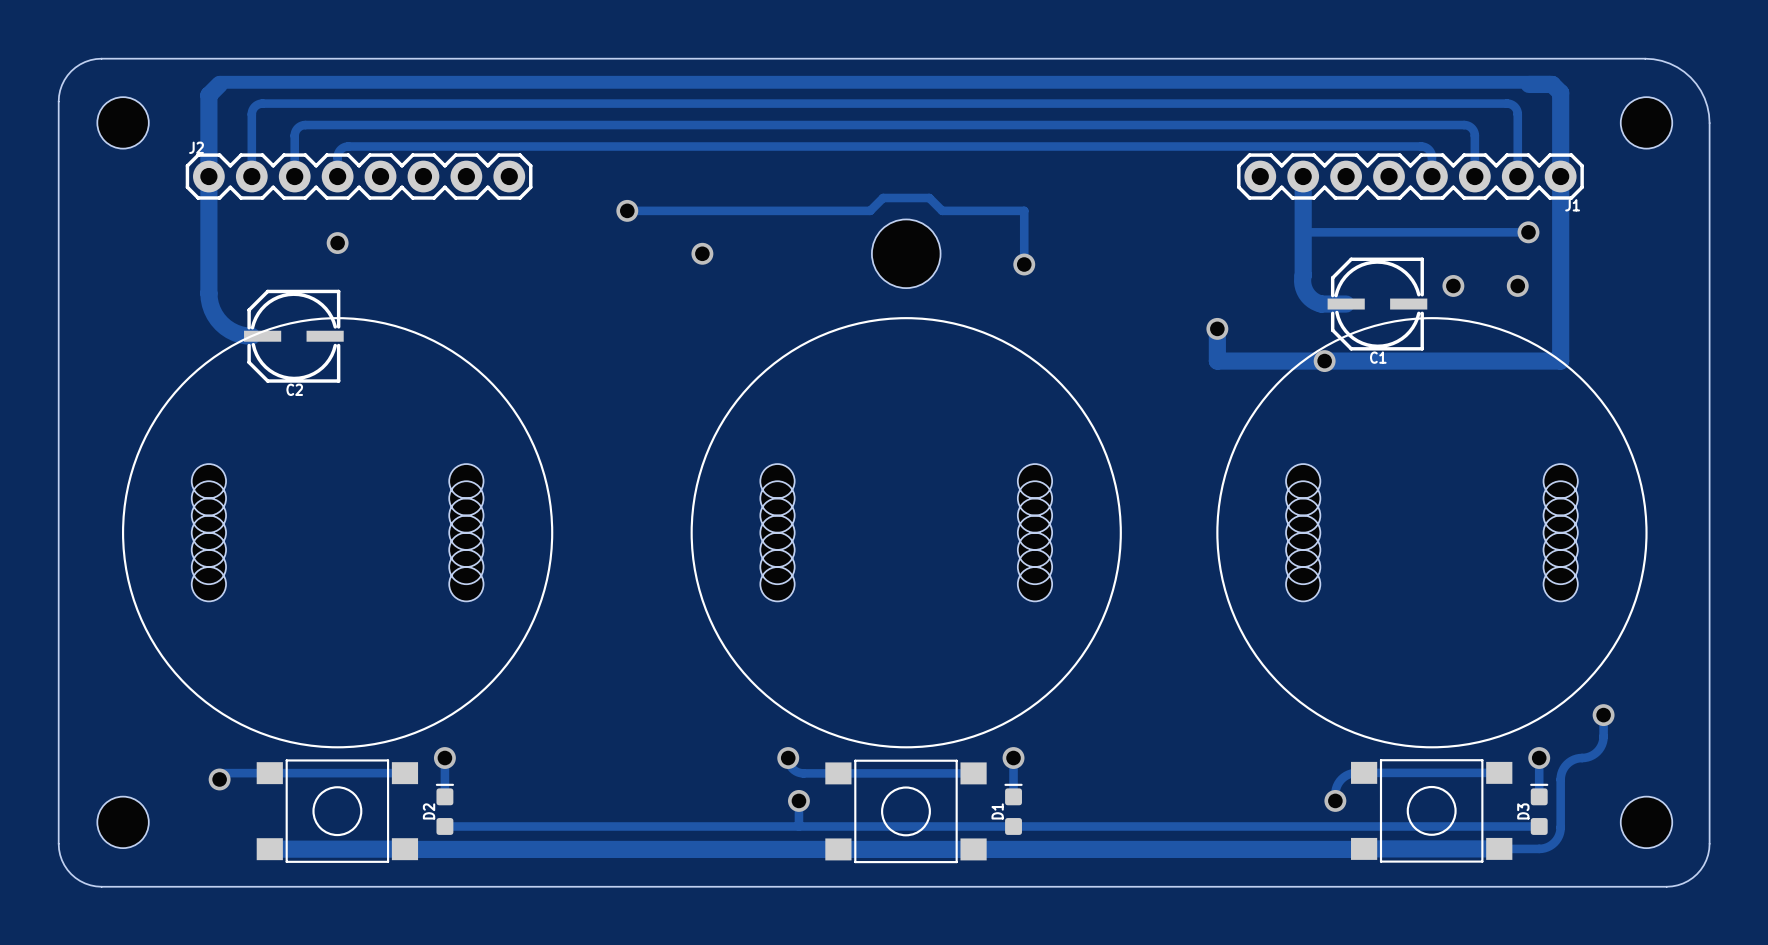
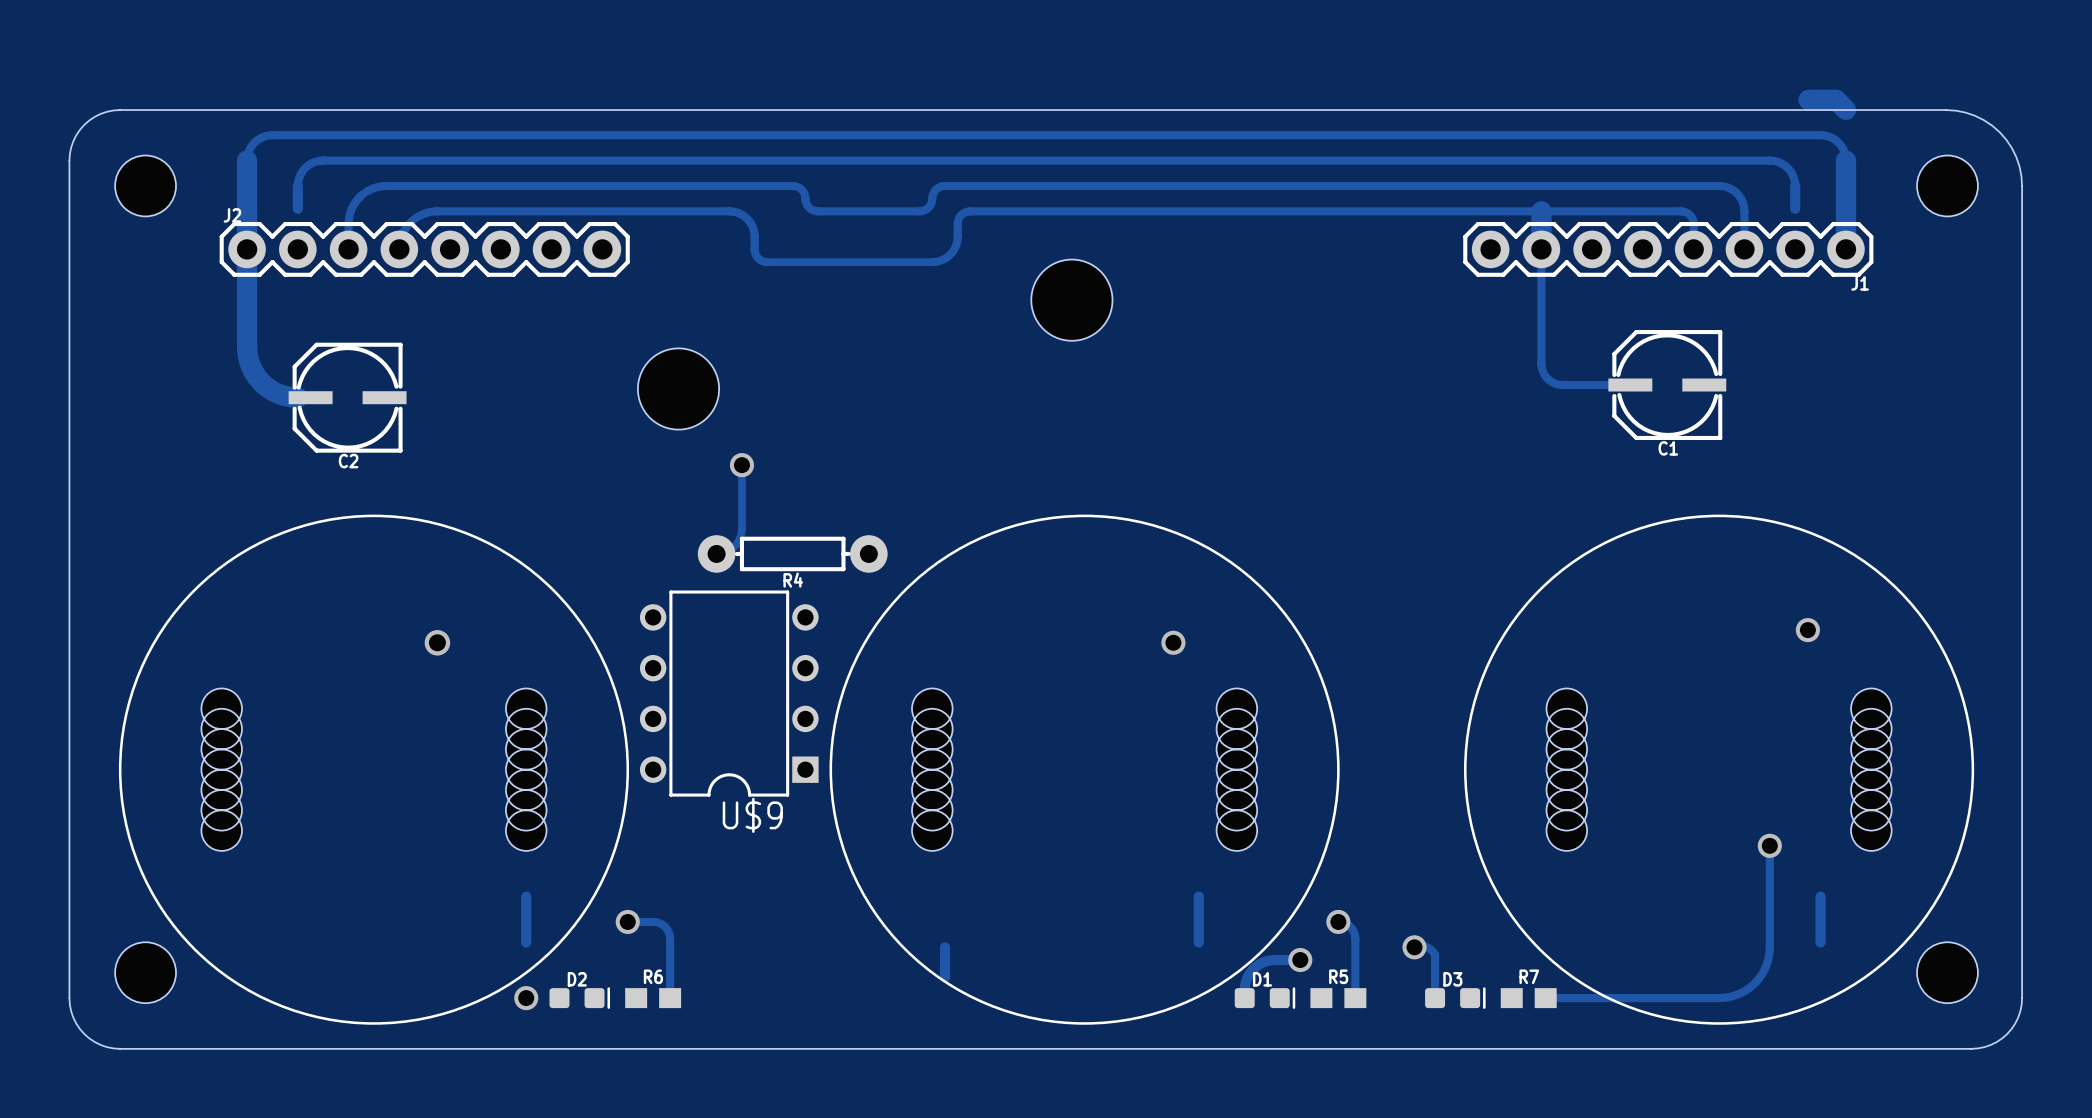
track: (1549, 82) (219, 82) (1549, 82) -> none
track: (1549, 82) (1560, 92) (1560, 135) -> none
track: (219, 84) (208, 95) (208, 135) -> (1845, 160) (1844, 150) (1838, 142) (1830, 137) (1820, 135) (272, 135) (262, 137) (254, 142) (249, 150) (247, 160)
hole position: (123, 122) -> (145, 185)
hole position: (1646, 122) -> (1947, 185)
board edge: (58, 135) (59, 96) (64, 80) (80, 64) (101, 58) (1645, 58) (1661, 60) (1677, 67) (1690, 77) (1700, 90) (1709, 114) (1709, 157) -> (69, 160) (73, 141) (84, 124) (100, 113) (120, 110) (1945, 110) (1975, 115) (1999, 132) (2016, 157) (2022, 186)
track: (251, 157) (252, 111) (256, 105) (262, 103) (1507, 103) (1513, 105) (1517, 111) (1517, 157) -> (297, 185) (299, 176) (305, 168) (313, 162) (323, 160) (1769, 160) (1779, 162) (1787, 168) (1793, 176) (1795, 185)
track: (294, 176) (295, 132) (298, 127) (305, 125) (1464, 125) (1470, 127) (1474, 132) (1474, 176) -> none
track: (337, 176) (338, 153) (342, 147) (348, 146) (1421, 146) (1426, 147) (1431, 153) (1431, 176) -> none
J2 position: (359, 176) -> (424, 249)
J1 position: (1410, 176) -> (1668, 249)
track: none -> (348, 249) (348, 219) (353, 205) (367, 191) (386, 185) (792, 185) (801, 189) (808, 206) (818, 211) (922, 210) (930, 205) (936, 189) (945, 185) (1719, 185) (1734, 191) (1742, 201) (1744, 211) (1744, 249)
track: none -> (399, 249) (402, 234) (410, 222) (422, 214) (437, 211) (732, 211) (741, 214) (749, 221) (754, 233) (755, 254) (761, 260) (767, 262) (938, 261) (947, 256) (954, 249) (957, 240) (958, 219) (964, 213) (970, 211) (1681, 211) (1688, 213) (1693, 220) (1693, 249)
track: (627, 210) (870, 210) (883, 197) (929, 197) (942, 210) (1024, 210) (1024, 264) -> none
via: (627, 210) -> none
track: (1560, 210) (1560, 361) (1217, 361) (1217, 328) -> none
track: (1303, 232) (1528, 232) -> none
track width: thick (1303, 232) (1303, 210) (1303, 275) -> thin (1541, 274) (1541, 249) (1541, 325)
via: (1528, 232) -> none
via: (337, 243) -> none
via: (702, 253) -> none
via: (1024, 264) -> none
track: (1303, 275) (1304, 290) (1312, 300) (1321, 304) (1346, 304) -> (1541, 325) (1541, 366) (1544, 374) (1549, 380) (1562, 385) (1630, 385)
via: (1453, 285) -> none
via: (1517, 285) -> none
C1 position: (1377, 304) -> (1667, 385)
part: none -> (678, 389)
via: (1217, 328) -> none
via: (1324, 361) -> none
track: none -> (741, 465) (741, 535) (732, 548) (716, 553)
via: none -> (741, 465)
R4: none -> (792, 553)
part position: (337, 532) -> (373, 769)
part position: (906, 532) -> (1084, 769)
part position: (1431, 532) -> (1719, 769)
via: none -> (1807, 630)
via: none -> (437, 642)
via: none -> (1173, 642)
U$9: none -> (729, 693)
track: none -> (1769, 845) (1769, 953) (1763, 972) (1749, 987) (1732, 996) (1719, 998) (1545, 998)
via: none -> (1769, 845)
track: (1603, 715) (1603, 739) (1599, 749) (1590, 756) (1571, 760) (1562, 771) (1560, 830) (1556, 840) (1549, 846) (1542, 848) (1499, 848) -> none
via: (1603, 715) -> none
via: (444, 758) -> none
track: (788, 758) (791, 767) (801, 773) (973, 773) -> none
via: (788, 758) -> none
via: (1013, 758) -> none
via: (1539, 758) -> none
track: (1499, 772) (1354, 773) (1346, 775) (1339, 781) (1336, 788) (1335, 800) -> none
track: (404, 773) (225, 773) (221, 774) (219, 779) -> none
via: (219, 779) -> none
track: none -> (627, 921) (657, 922) (667, 930) (670, 938) (670, 998)
via: none -> (627, 921)
track: none -> (1338, 921) (1348, 925) (1354, 934) (1355, 998)
via: none -> (1338, 921)
via: (798, 800) -> none
track: none -> (1414, 947) (1426, 947) (1435, 955) (1435, 998)
via: none -> (1414, 947)
via: (1335, 800) -> none
D2 rotation: 0° (444, 809) -> 90° clockwise (579, 998)
D2 position: (444, 809) -> (579, 998)
D1 rotation: 0° (1013, 809) -> 90° clockwise (1264, 998)
D1 position: (1013, 809) -> (1264, 998)
D3 rotation: 0° (1539, 809) -> 90° clockwise (1455, 998)
D3 position: (1539, 809) -> (1455, 998)
part: (1431, 810) -> none
part: (337, 811) -> none
part: (905, 811) -> none
track: none -> (1300, 960) (1270, 960) (1256, 966) (1247, 978) (1244, 998)
via: none -> (1300, 960)
track: (444, 826) (1539, 826) -> none
via: none -> (526, 998)
R6: none -> (653, 998)
R5: none -> (1338, 998)
R7: none -> (1528, 998)
track: (1499, 848) (402, 849) -> none
track: (404, 849) (269, 849) (404, 849) -> none

